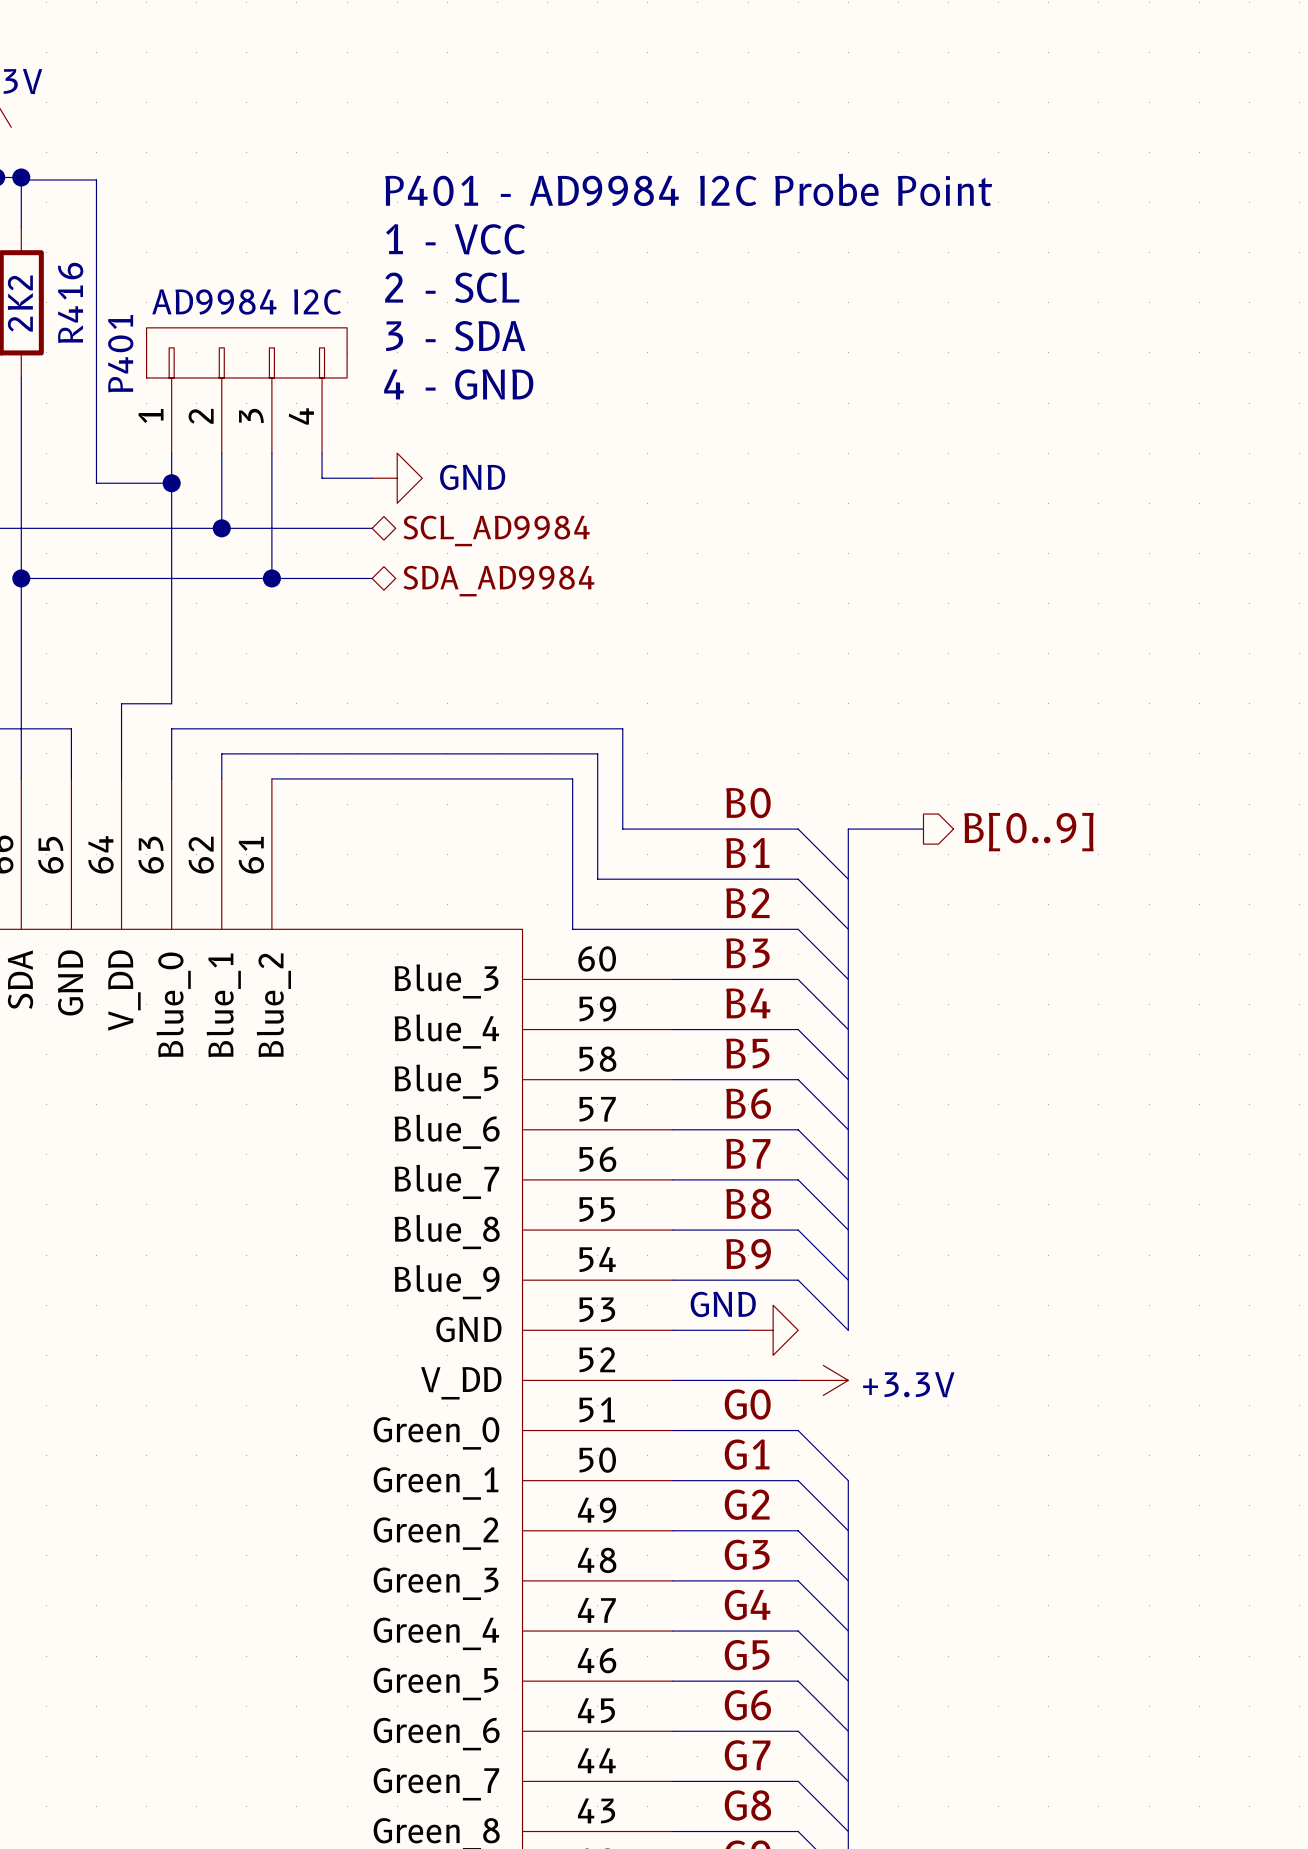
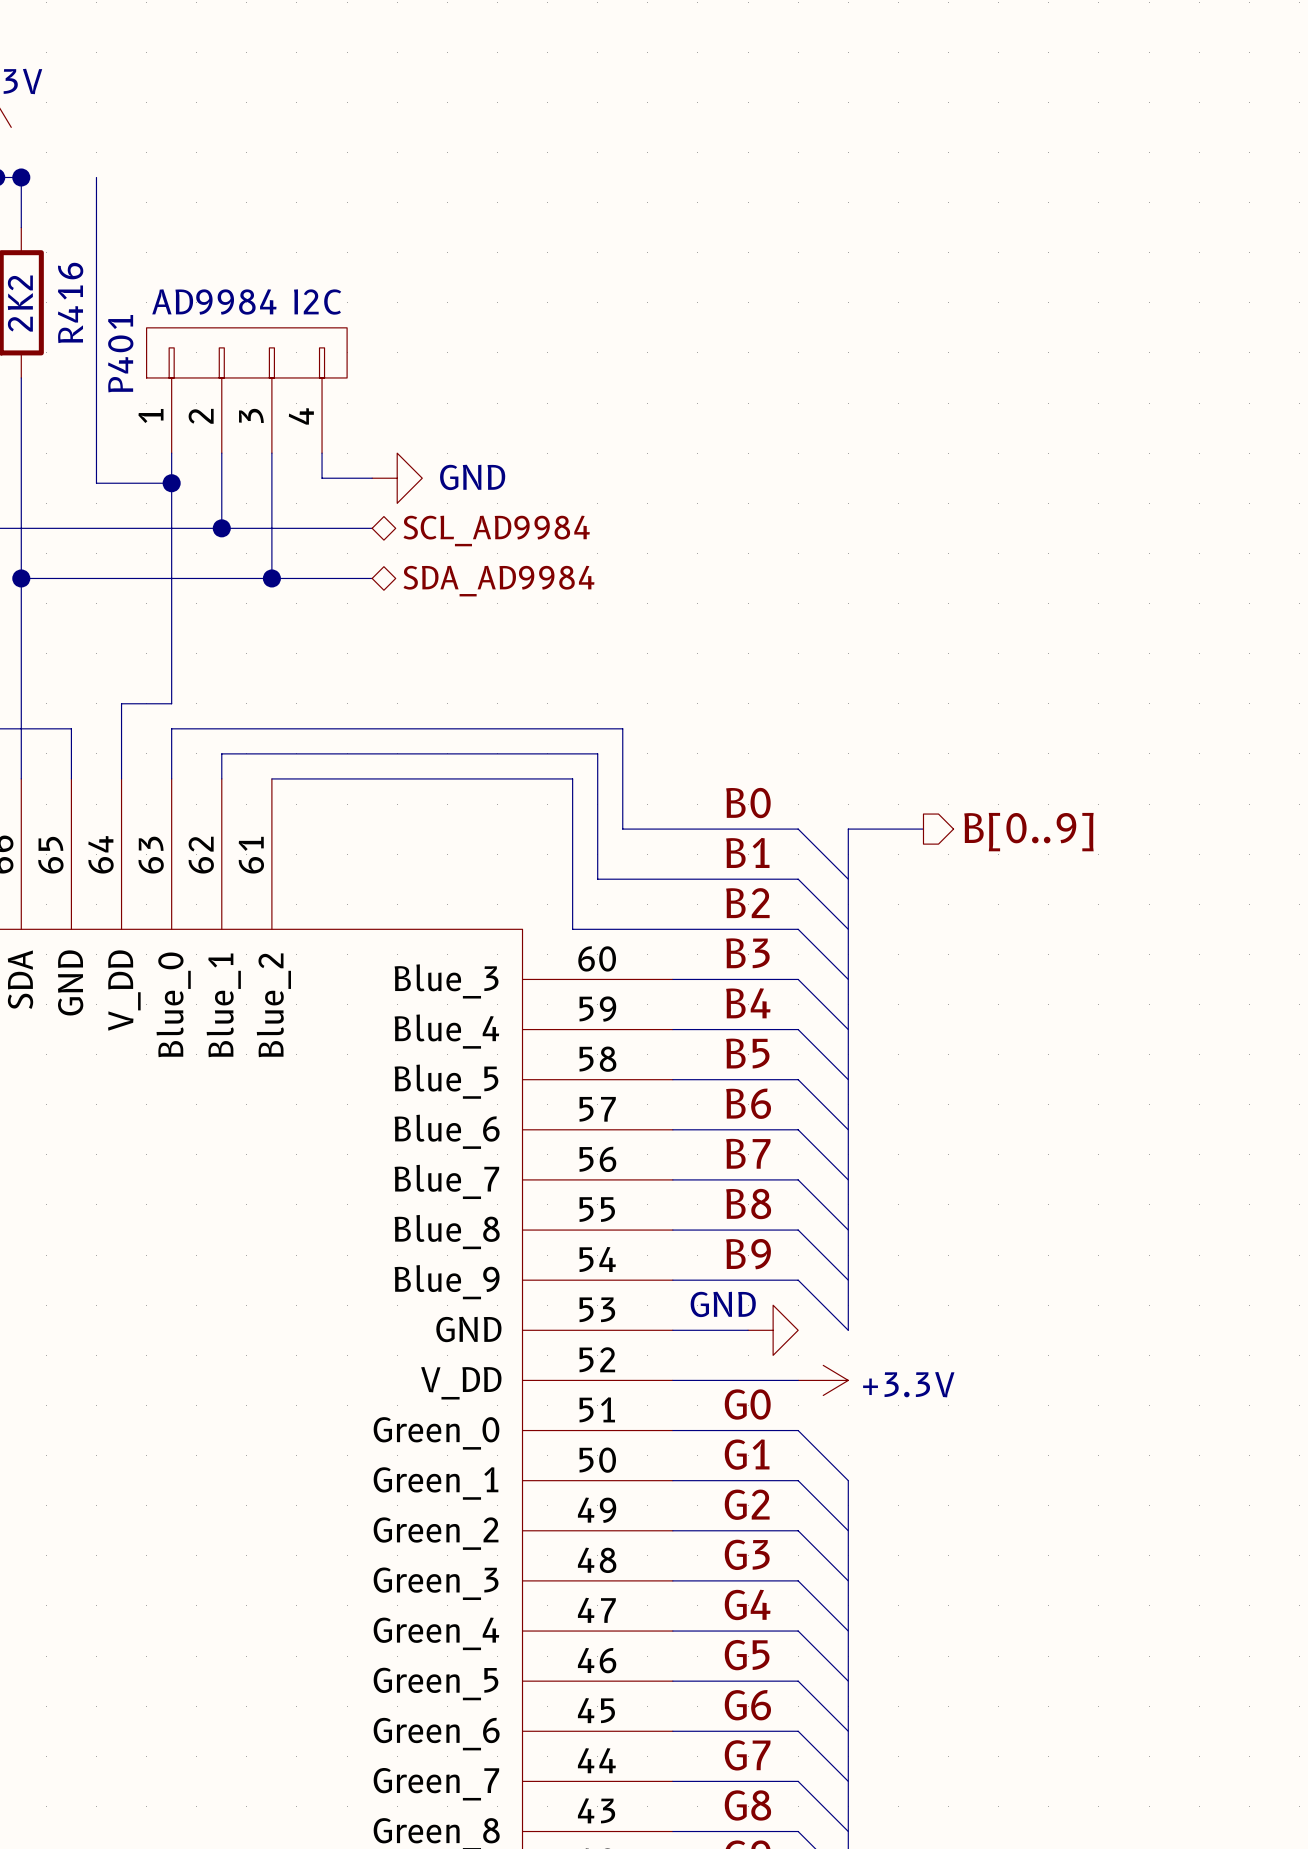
wire: (21, 179) (96, 179) -> (96, 177) (96, 179)
text: P401 - AD9984 I2C Probe Point (688, 189) -> none
text: 1 - VCC (455, 239) -> none
text: 2 - SCL (452, 287) -> none
text: 3 - SDA (455, 336) -> none
text: 4 - GND (458, 384) -> none

